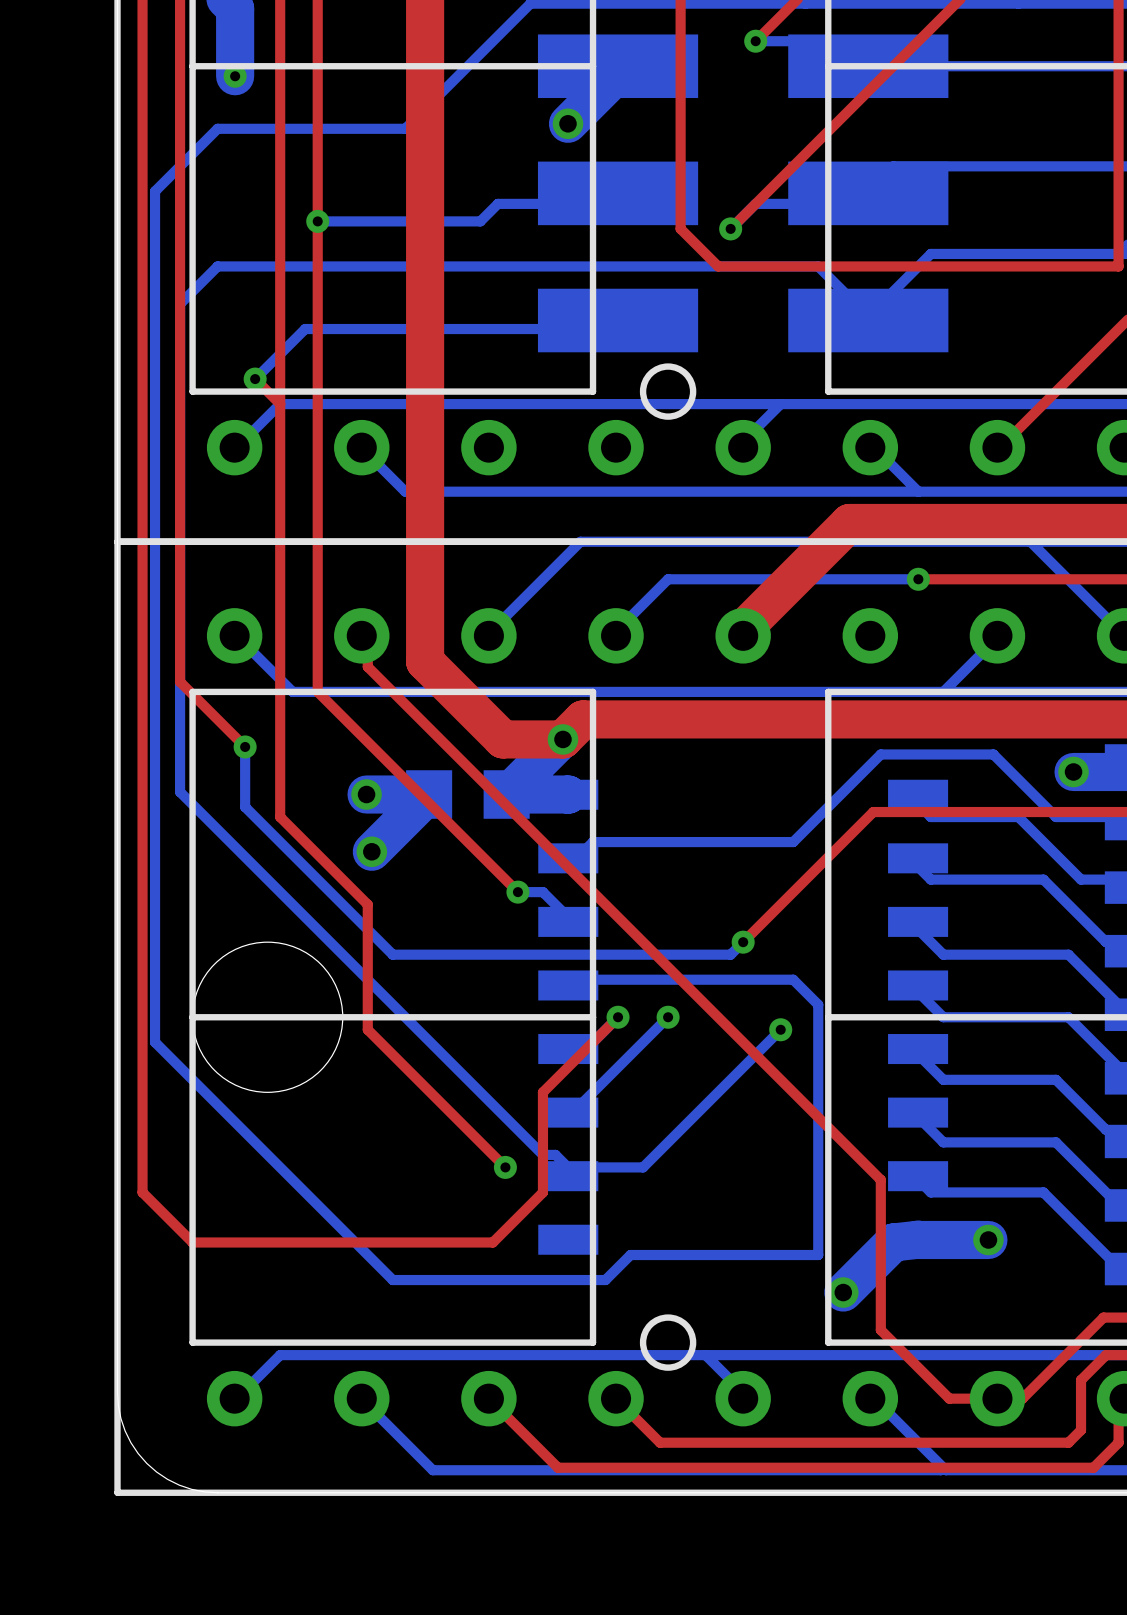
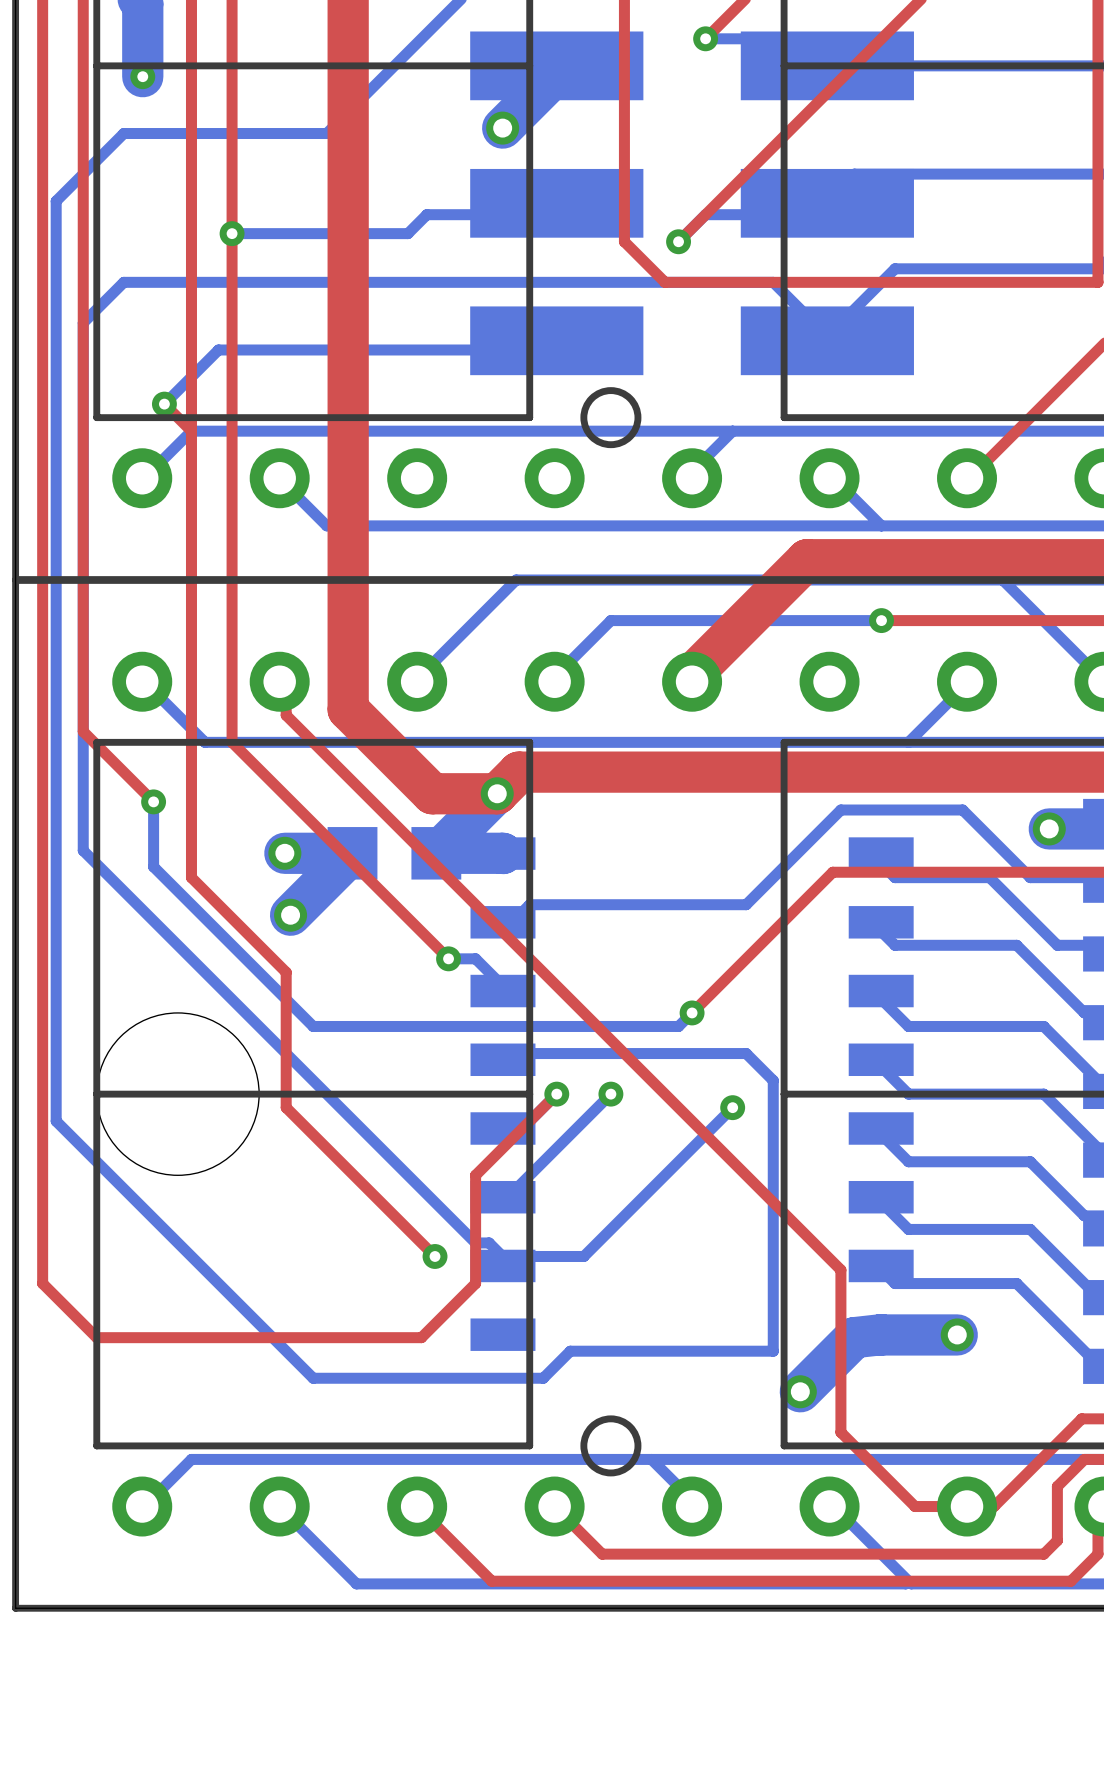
board edge: (117, 1392) (120, 1418) (125, 1430) (130, 1442) (146, 1463) (167, 1479) (179, 1485) (191, 1489) (217, 1492) -> (15, 1500) (15, 1608) (123, 1608)

